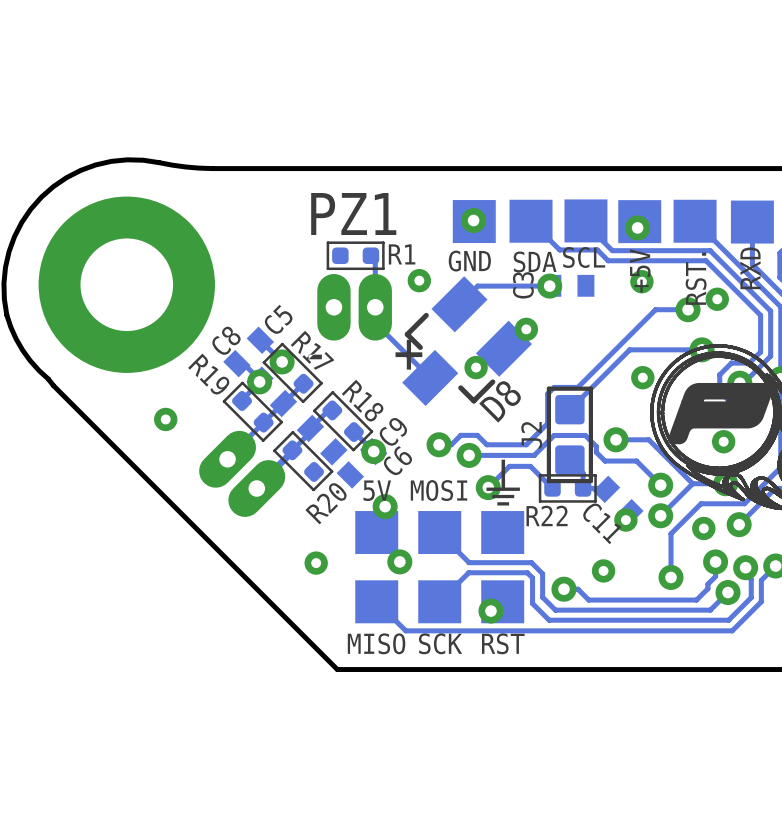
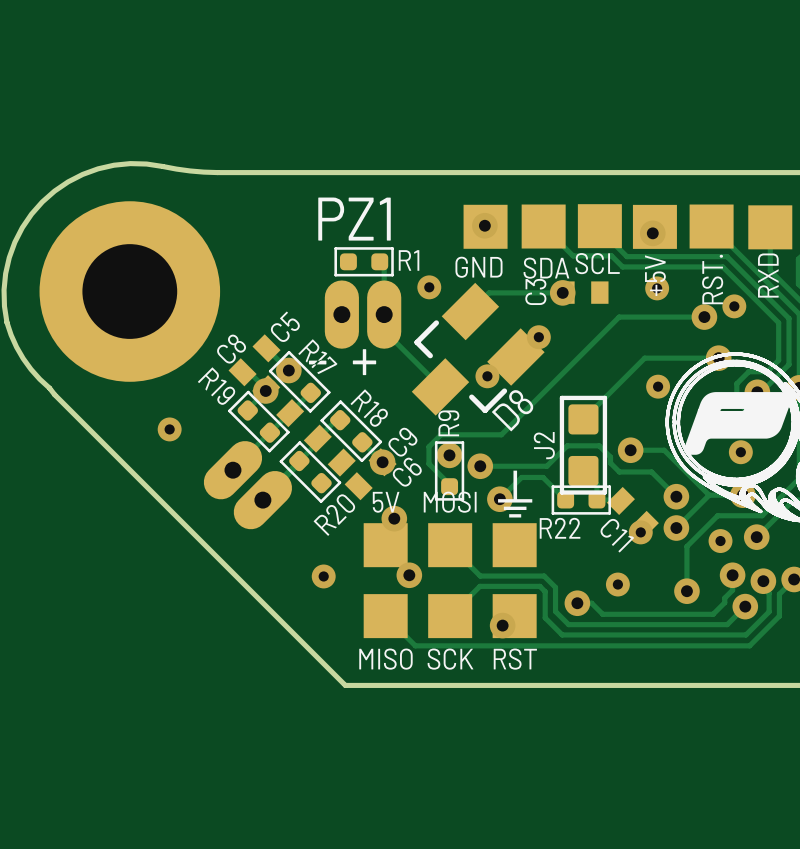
track: (655, 309) (577, 387) (554, 387) (547, 394) (547, 423) (526, 444) (486, 444) (477, 435) (460, 435) (451, 444) (439, 444) -> (671, 317) (619, 317) (501, 434) (440, 434) (428, 446) (428, 463) (449, 486)
R9: none -> (449, 471)

